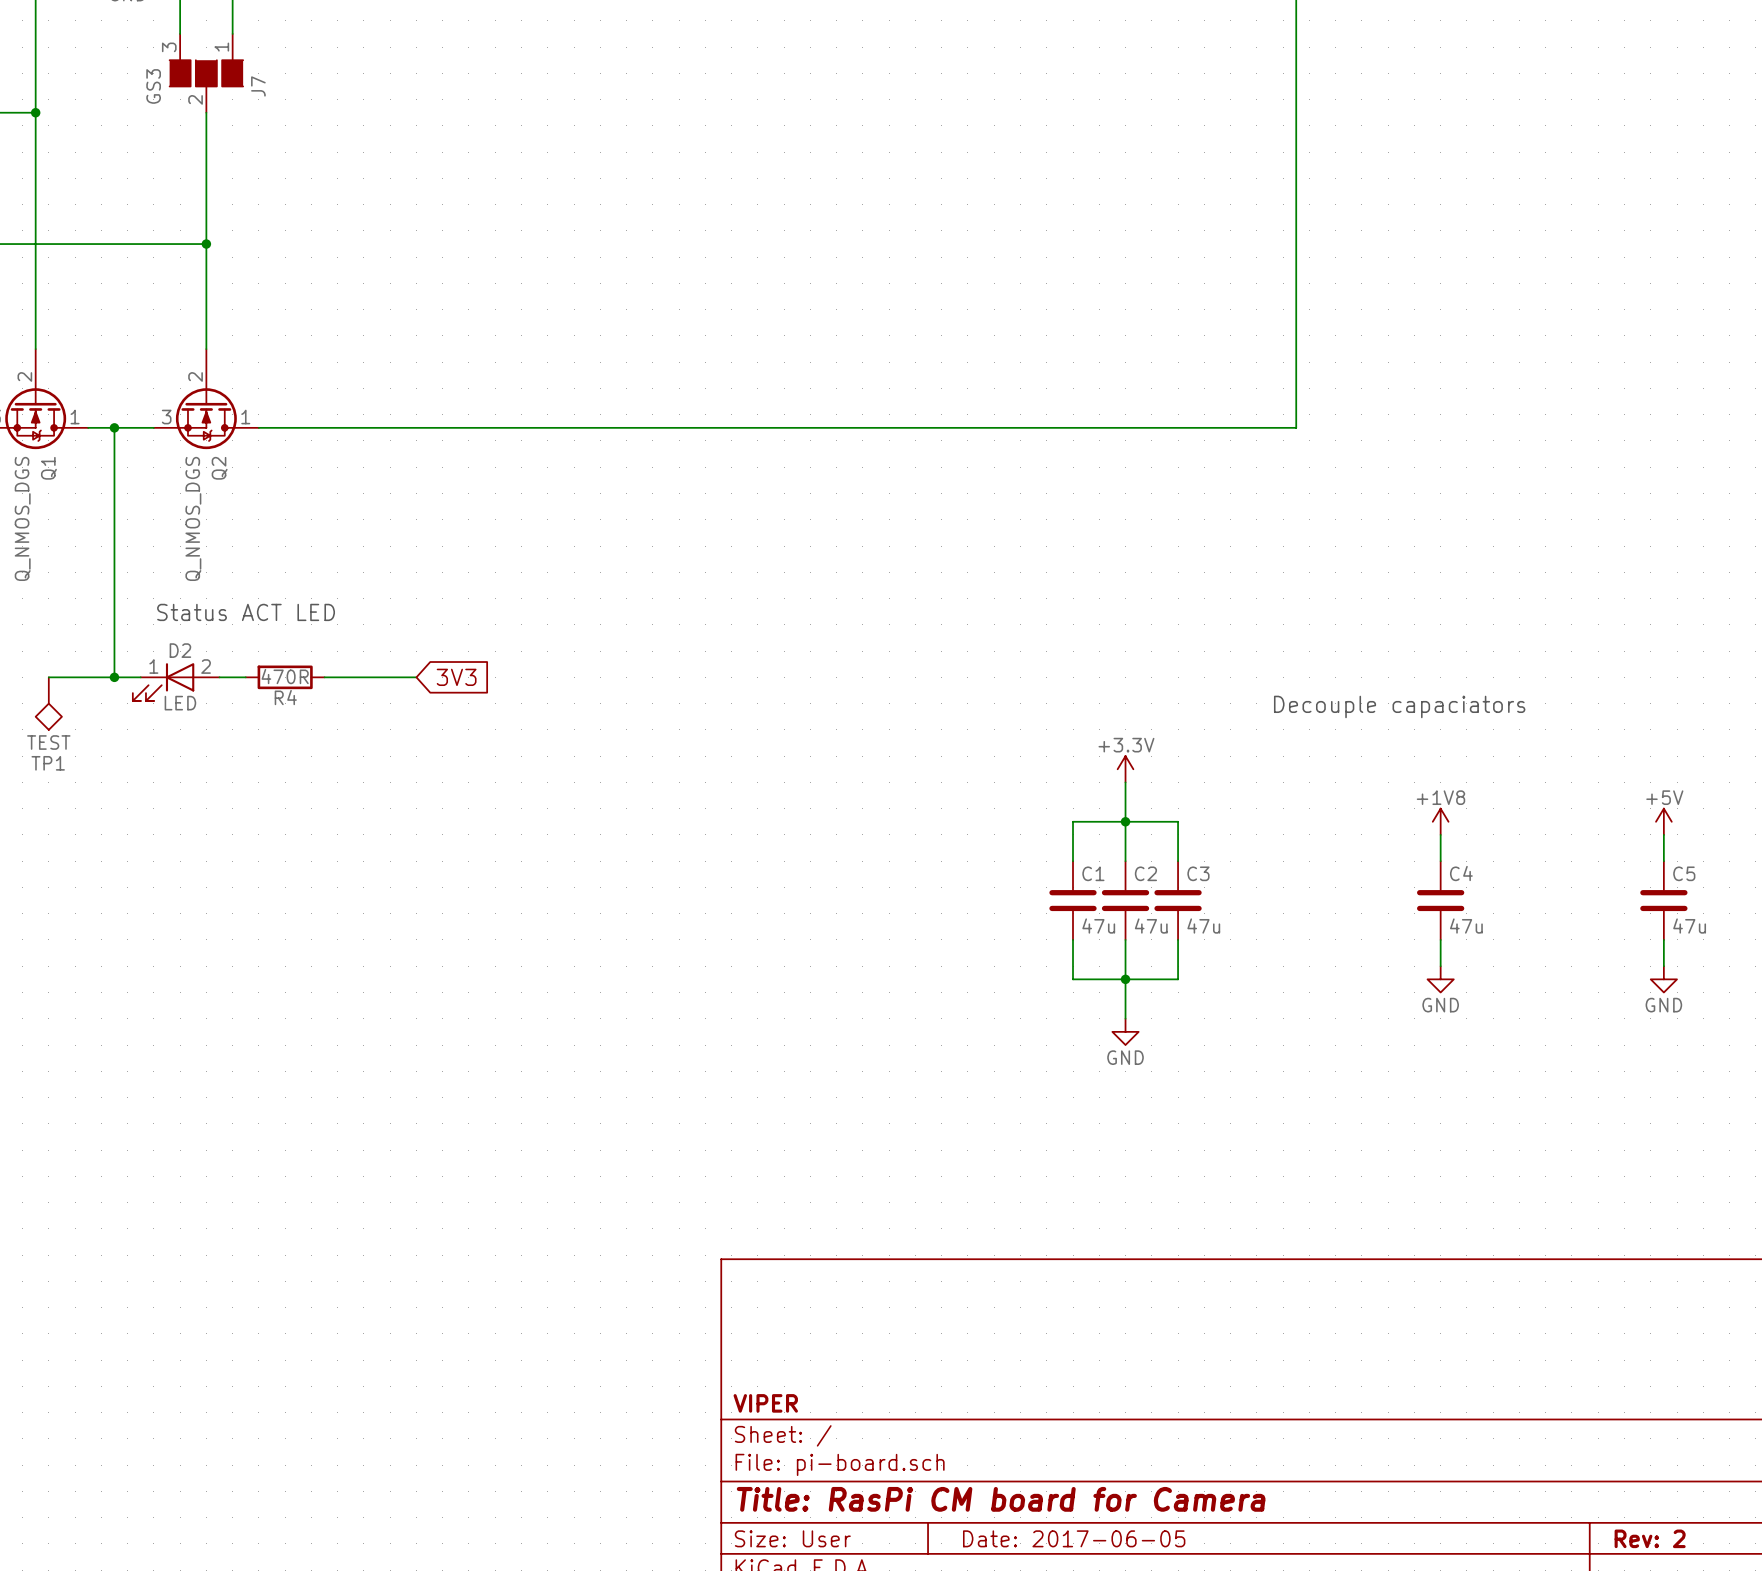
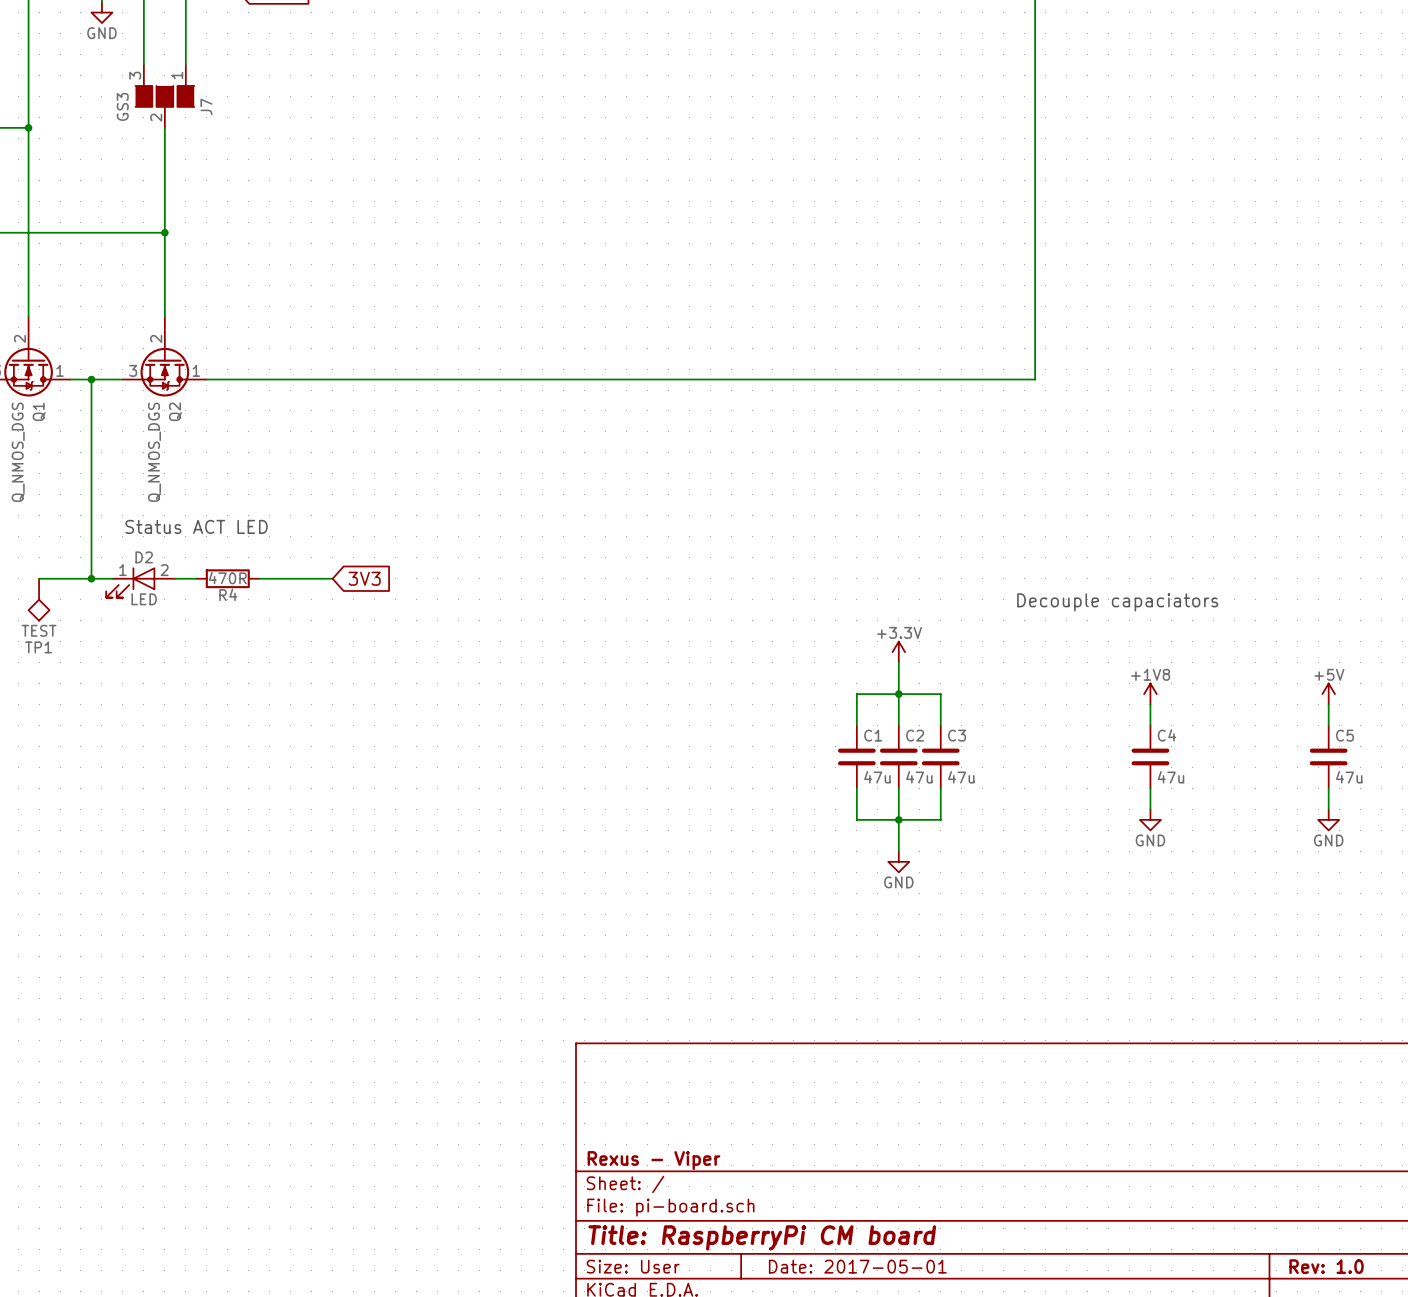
title block: VIPER (765, 1403) -> Rexus - Viper (653, 1160)
title block: Title: RasPi CM board for Camera (1001, 1499) -> Title: RaspberryPi CM board (762, 1237)
title block: Date: 2017-06-05 (1074, 1538) -> Date: 2017-05-01 (857, 1266)
title block: Rev: 2 (1650, 1538) -> Rev: 1.0 (1326, 1266)

